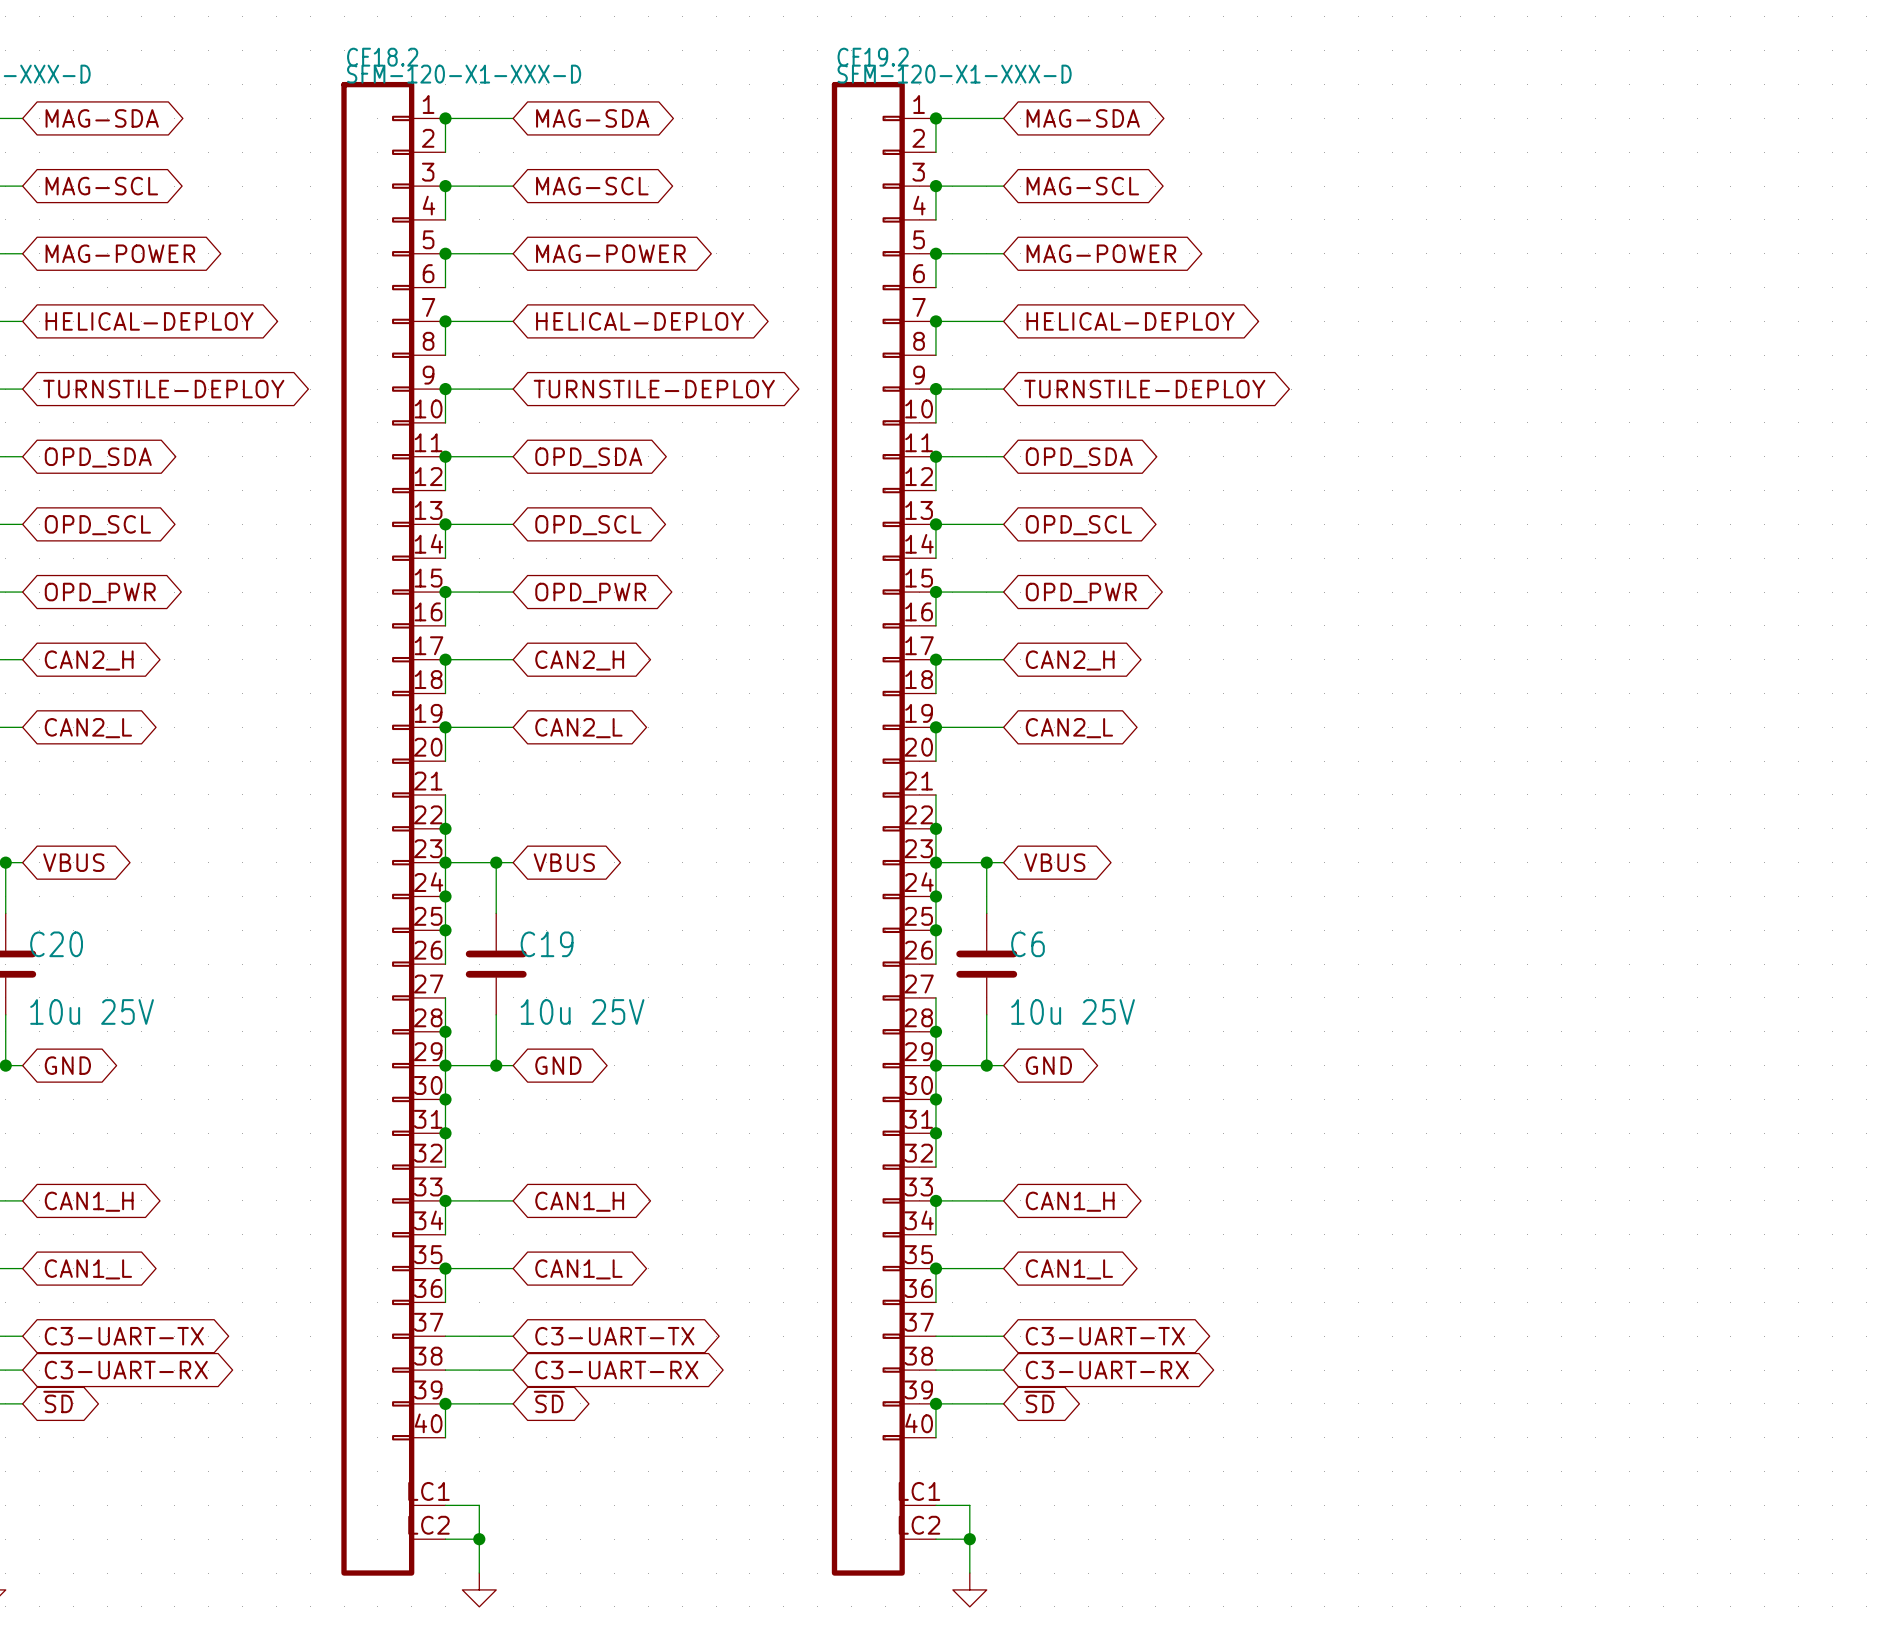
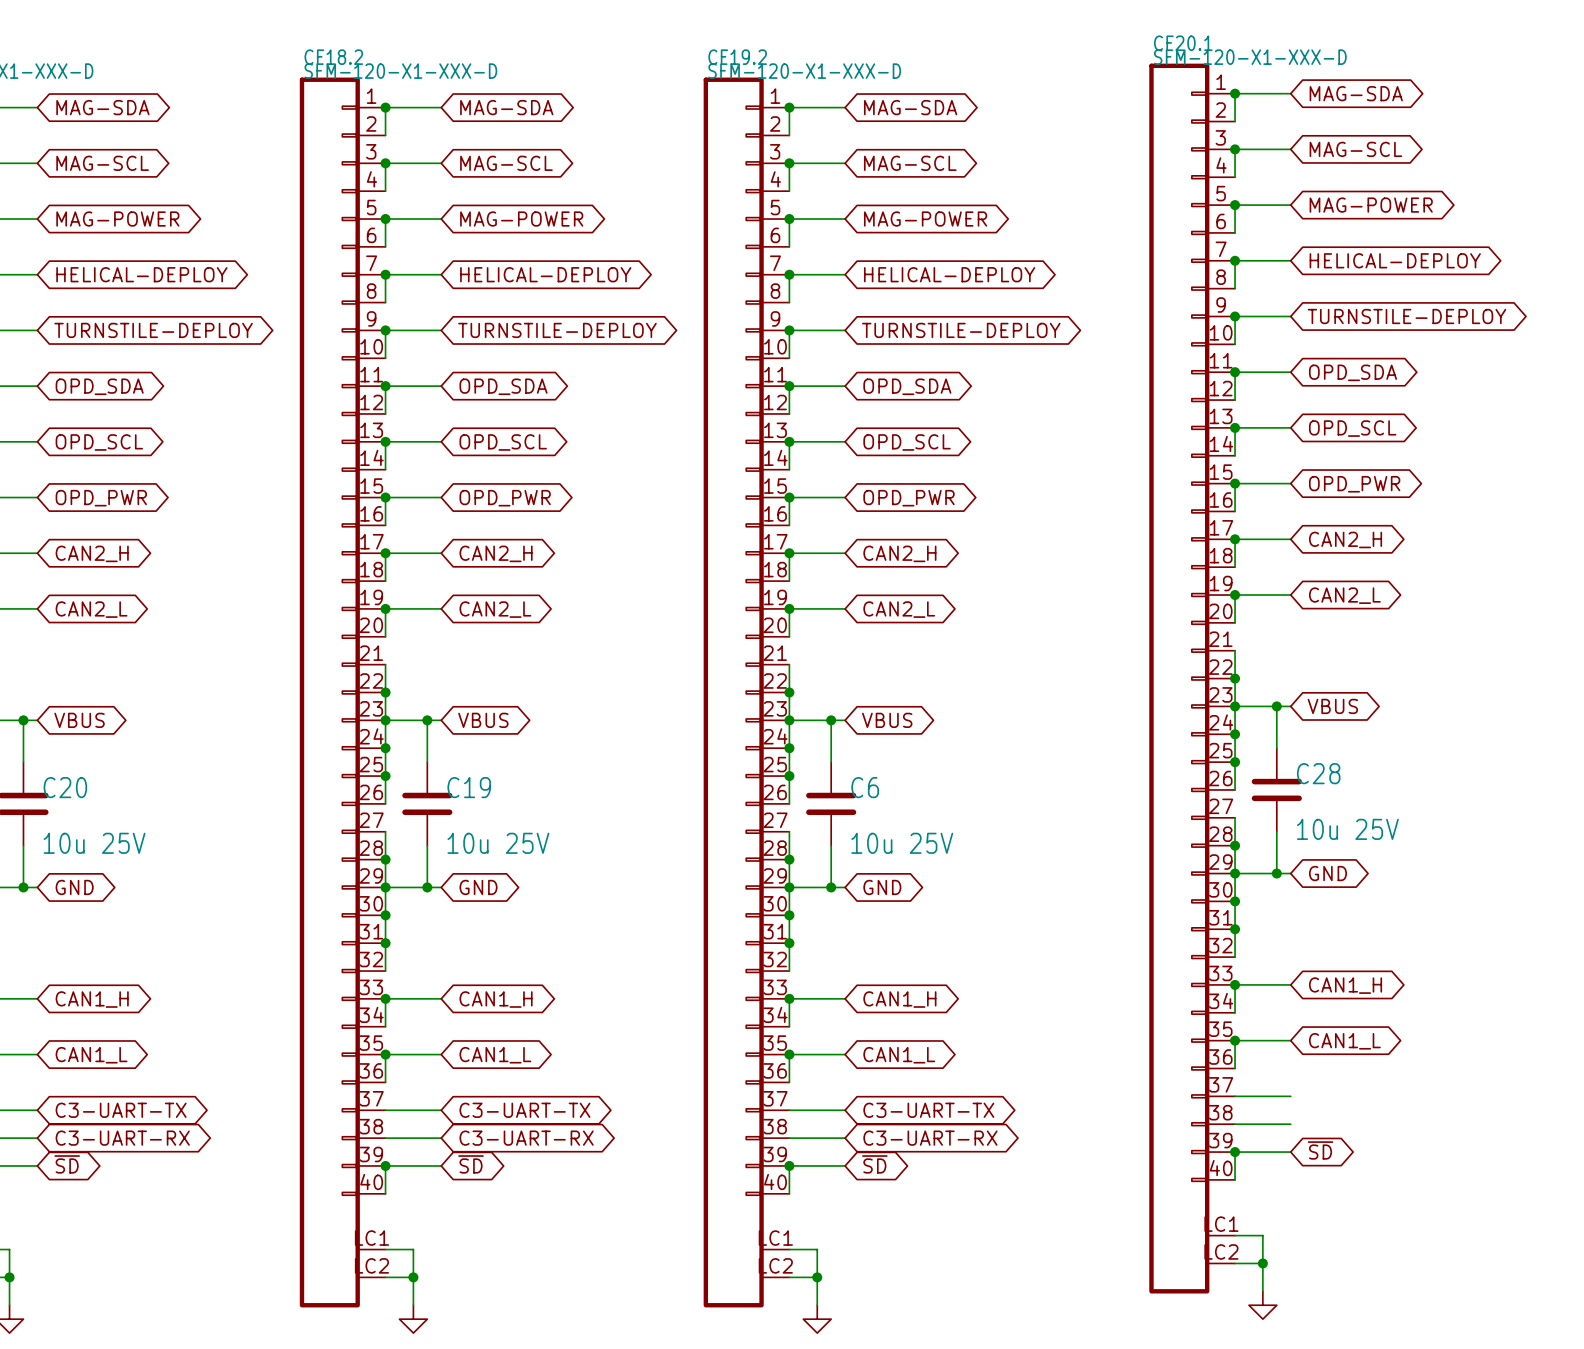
junction: none -> (1235, 93)
wire: none -> (1290, 93) (1235, 93) (1235, 121)
global label: none -> MAG-SDA (1356, 93)
junction: none -> (1235, 149)
wire: none -> (1290, 149) (1235, 149) (1235, 177)
global label: none -> MAG-SCL (1355, 149)
junction: none -> (1235, 205)
wire: none -> (1290, 205) (1235, 205) (1235, 232)
global label: none -> MAG-POWER (1371, 205)
junction: none -> (1235, 260)
wire: none -> (1290, 260) (1235, 260) (1235, 288)
global label: none -> HELICAL-DEPLOY (1395, 260)
junction: none -> (1235, 316)
wire: none -> (1290, 316) (1235, 316) (1235, 344)
global label: none -> TURNSTILE-DEPLOY (1406, 316)
junction: none -> (1235, 372)
wire: none -> (1290, 372) (1235, 372) (1235, 400)
global label: none -> OPD_SDA (1353, 372)
junction: none -> (1235, 427)
wire: none -> (1290, 427) (1235, 427) (1235, 455)
global label: none -> OPD_SCL (1352, 428)
junction: none -> (1235, 483)
wire: none -> (1290, 483) (1235, 483) (1235, 511)
global label: none -> OPD_PWR (1354, 484)
junction: none -> (1235, 539)
wire: none -> (1290, 539) (1235, 539) (1235, 567)
global label: none -> CAN2_H (1345, 539)
junction: none -> (1235, 595)
wire: none -> (1290, 595) (1235, 595) (1235, 622)
global label: none -> CAN2_L (1344, 595)
wire: none -> (1235, 650) (1235, 789)
CF20.1: none -> SFM-120-X1-XXX-D (1192, 678)
junction: none -> (1235, 678)
wire: none -> (1235, 706) (1290, 706)
junction: none -> (1235, 706)
wire: none -> (1276, 706) (1276, 748)
junction: none -> (1276, 706)
global label: none -> VBUS (1332, 706)
junction: none -> (1235, 734)
junction: none -> (1235, 762)
C28: none -> 10u 25V (1276, 789)
wire: none -> (1235, 817) (1235, 957)
wire: none -> (1276, 831) (1276, 873)
junction: none -> (1235, 845)
wire: none -> (1235, 873) (1290, 873)
junction: none -> (1235, 873)
junction: none -> (1276, 873)
global label: none -> GND (1327, 873)
junction: none -> (1235, 901)
junction: none -> (1235, 929)
junction: none -> (1235, 984)
wire: none -> (1290, 984) (1235, 984) (1235, 1012)
global label: none -> CAN1_H (1345, 985)
junction: none -> (1235, 1040)
wire: none -> (1290, 1040) (1235, 1040) (1235, 1068)
global label: none -> CAN1_L (1344, 1041)
wire: none -> (1235, 1096) (1290, 1096)
wire: none -> (1235, 1124) (1290, 1124)
global label: none -> ~{SD} (1320, 1150)
junction: none -> (1235, 1152)
wire: none -> (1290, 1152) (1235, 1152) (1235, 1179)
wire: none -> (1235, 1235) (1262, 1235) (1262, 1291)
wire: none -> (1235, 1263) (1262, 1263)
junction: none -> (1262, 1263)
power symbol: none -> (1262, 1305)

